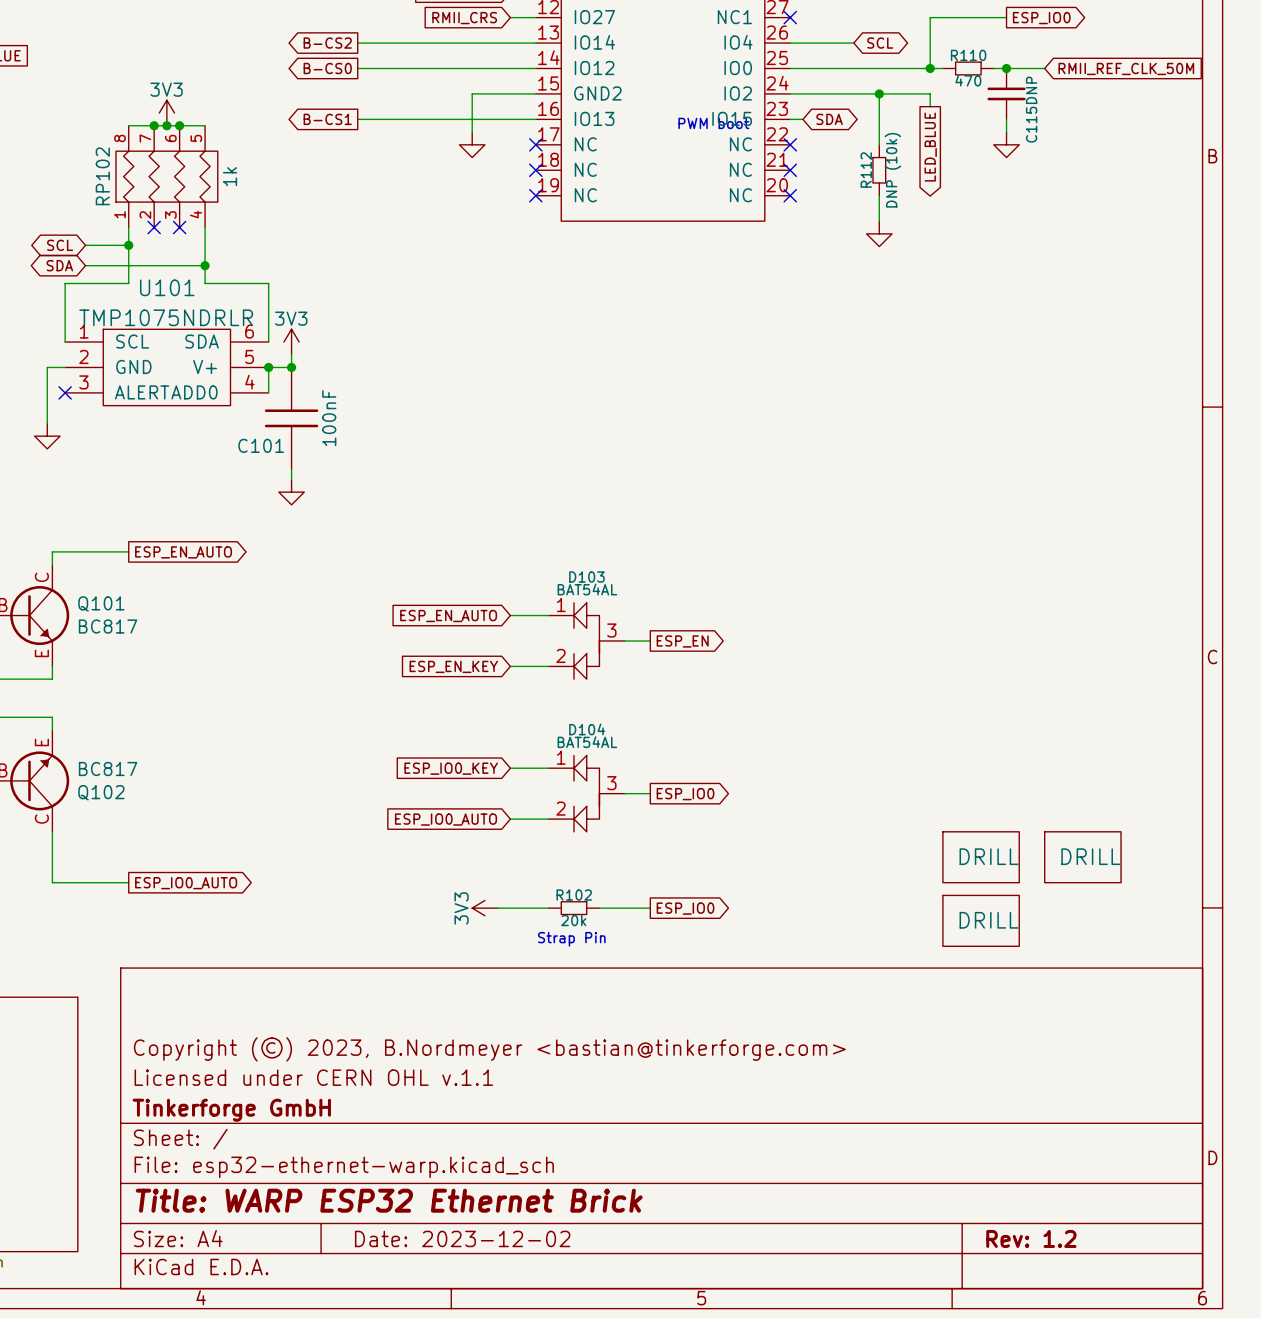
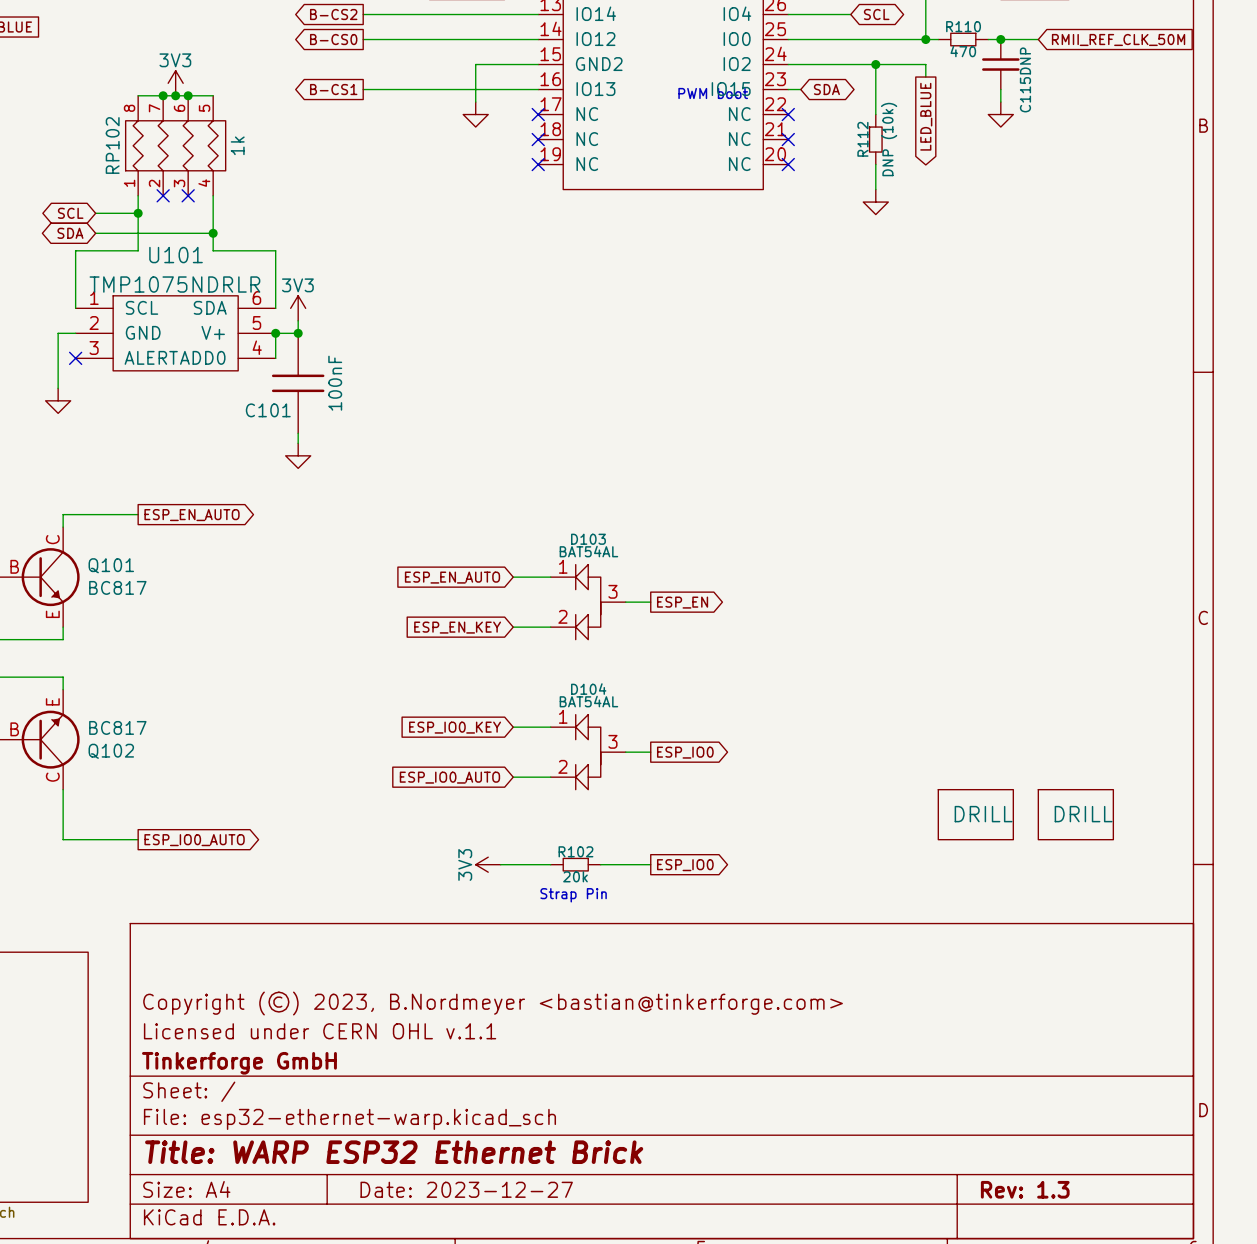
part: DRILL (981, 920) -> none
title block: Date: 2023-12-02 (462, 1238) -> Date: 2023-12-27 (466, 1189)
title block: Rev: 1.2 (1031, 1238) -> Rev: 1.3 (1025, 1189)

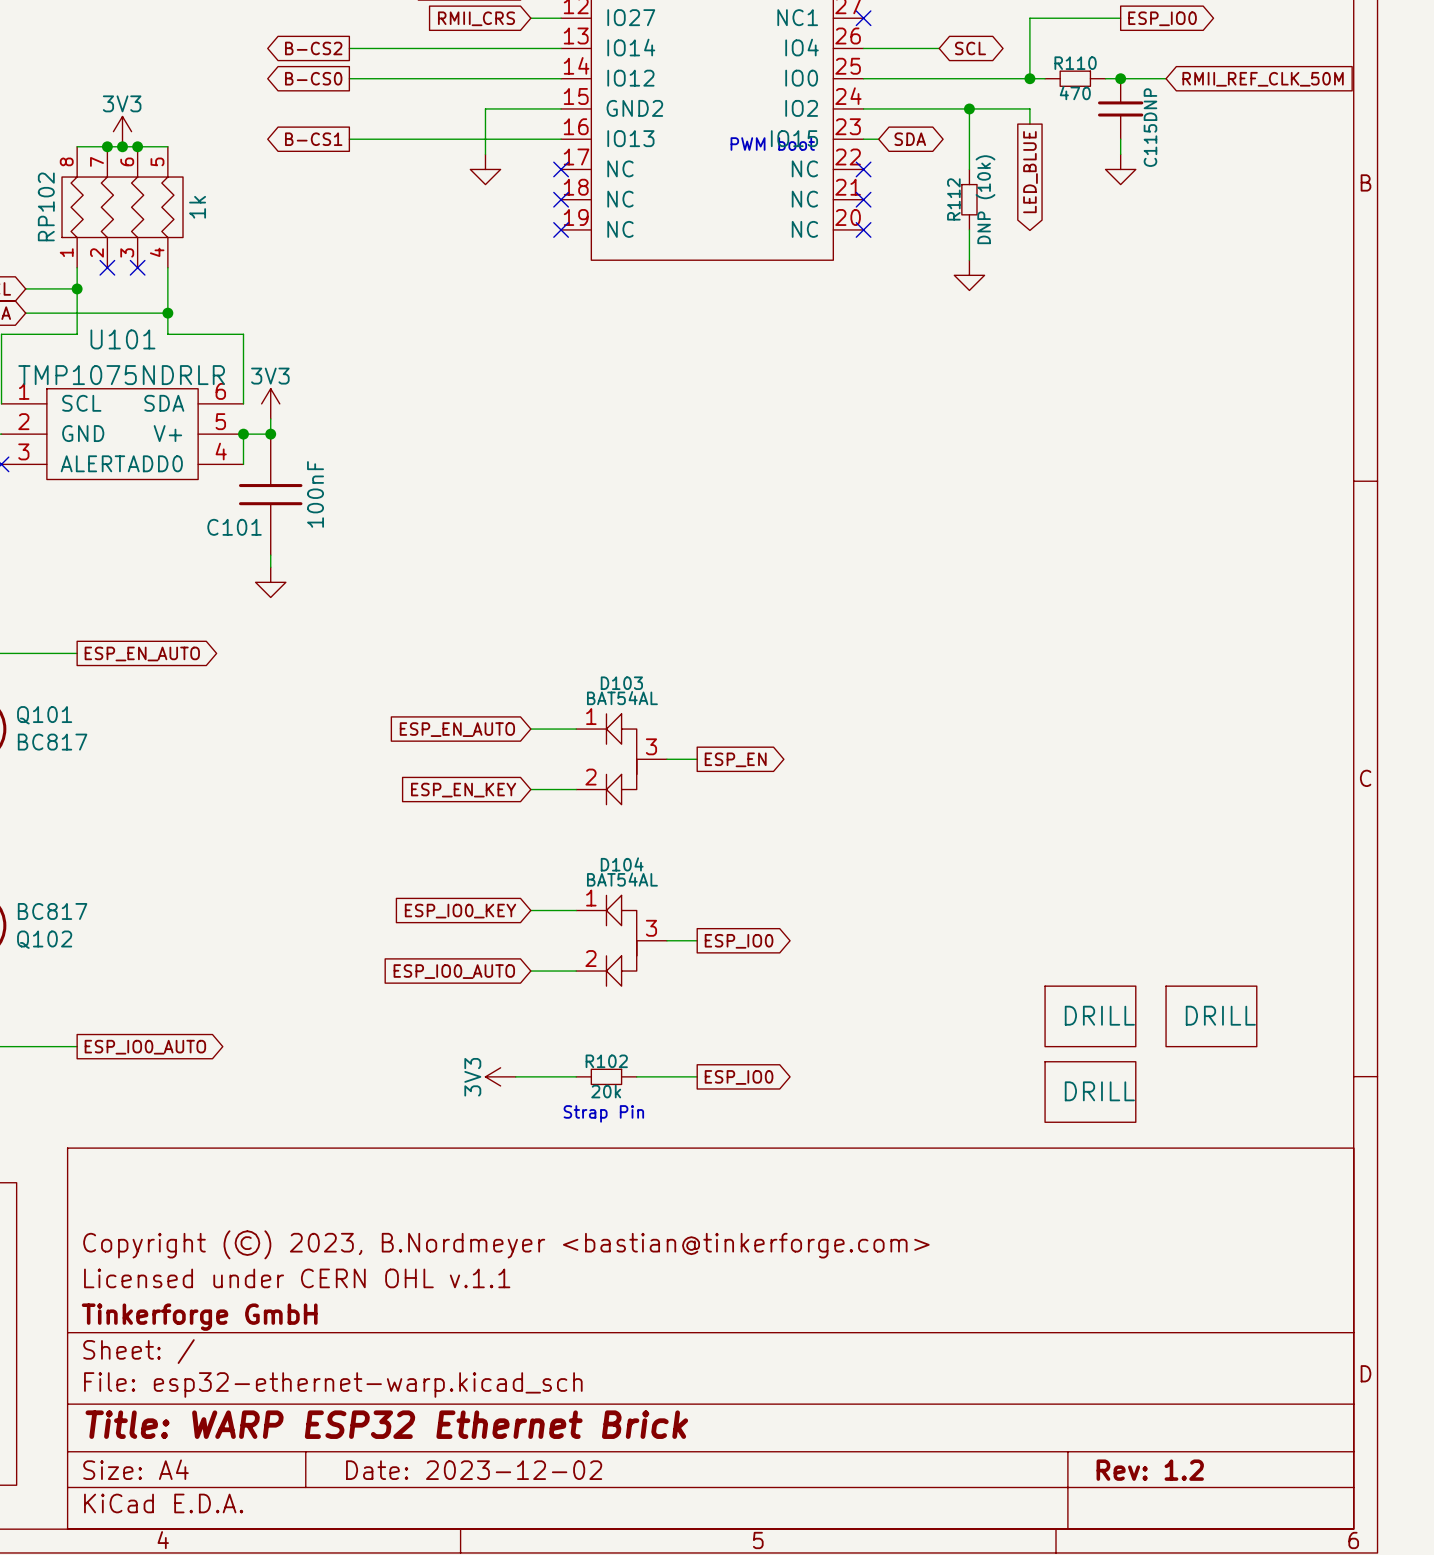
part: none -> DRILL (1090, 1092)
title block: Date: 2023-12-27 (466, 1189) -> Date: 2023-12-02 (474, 1470)
title block: Rev: 1.3 (1025, 1189) -> Rev: 1.2 (1150, 1470)

